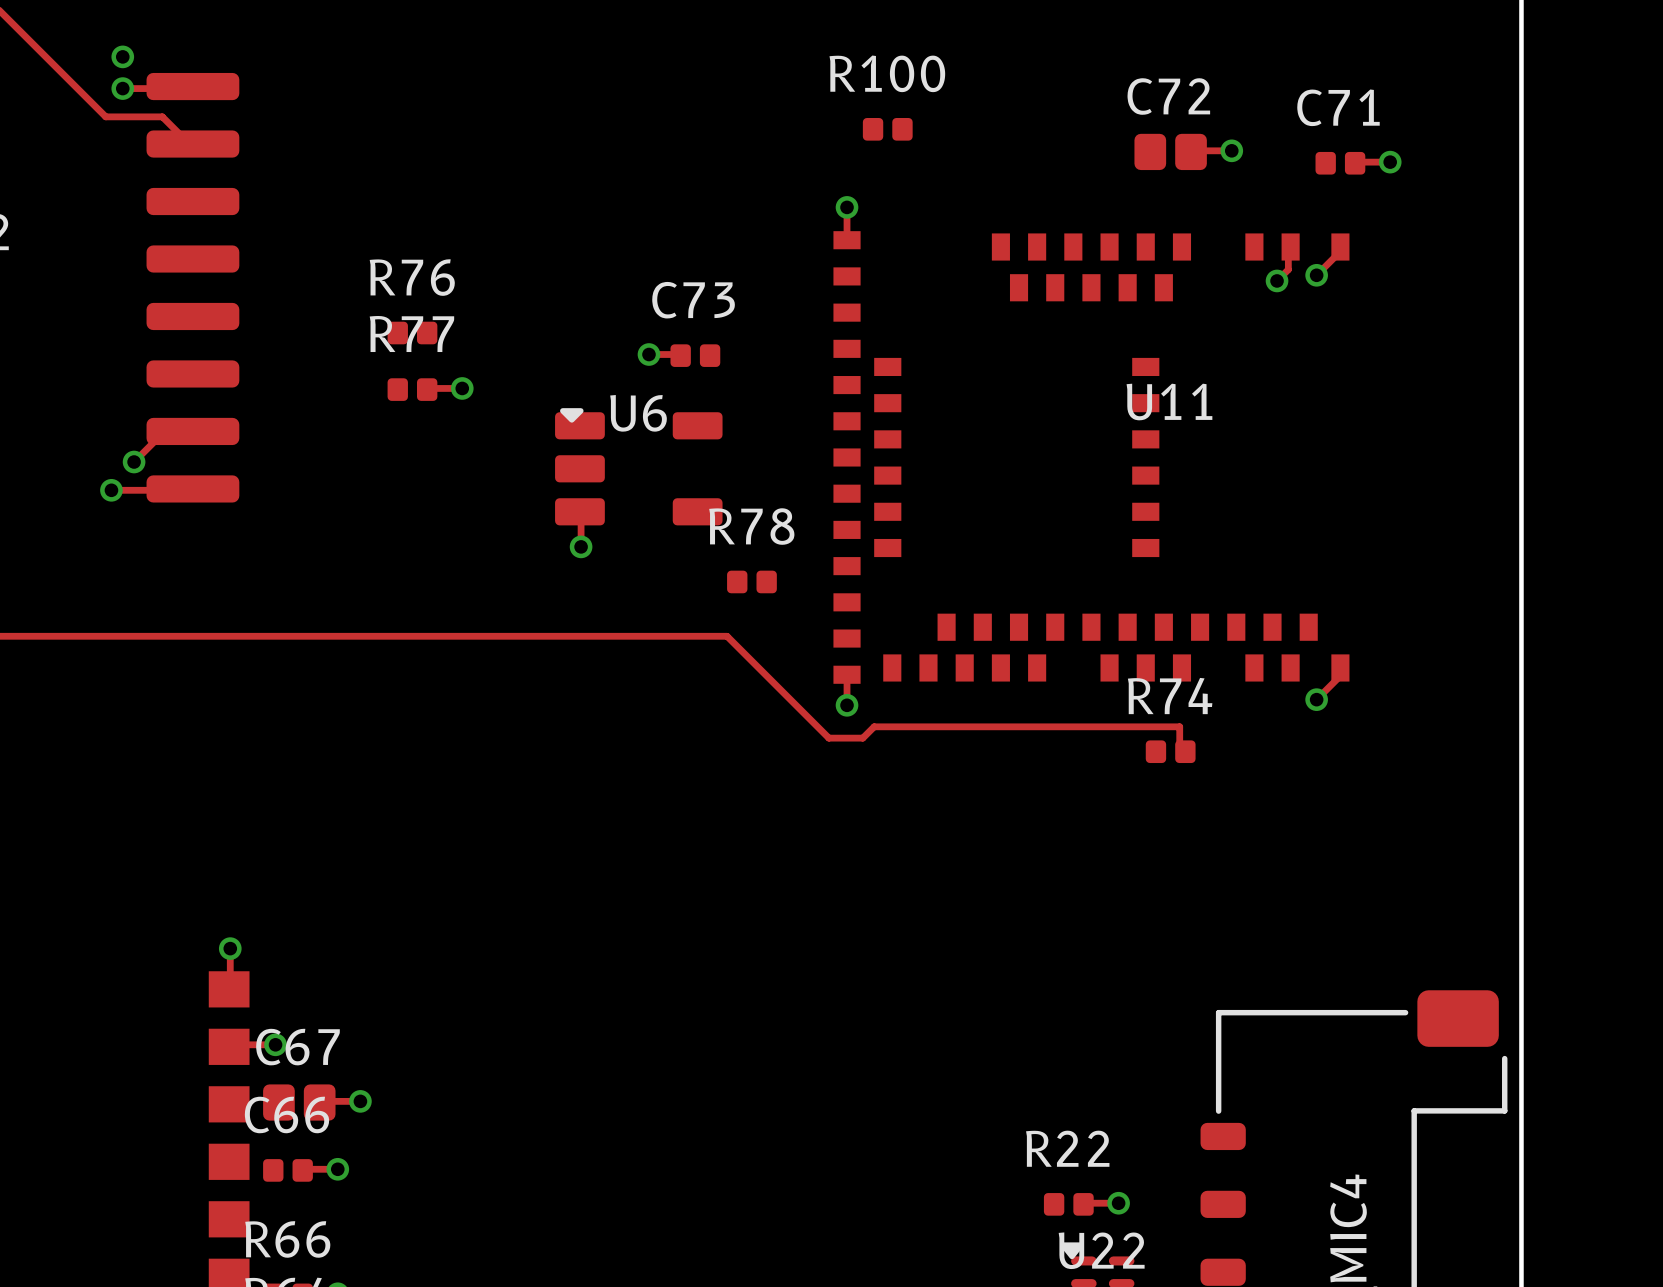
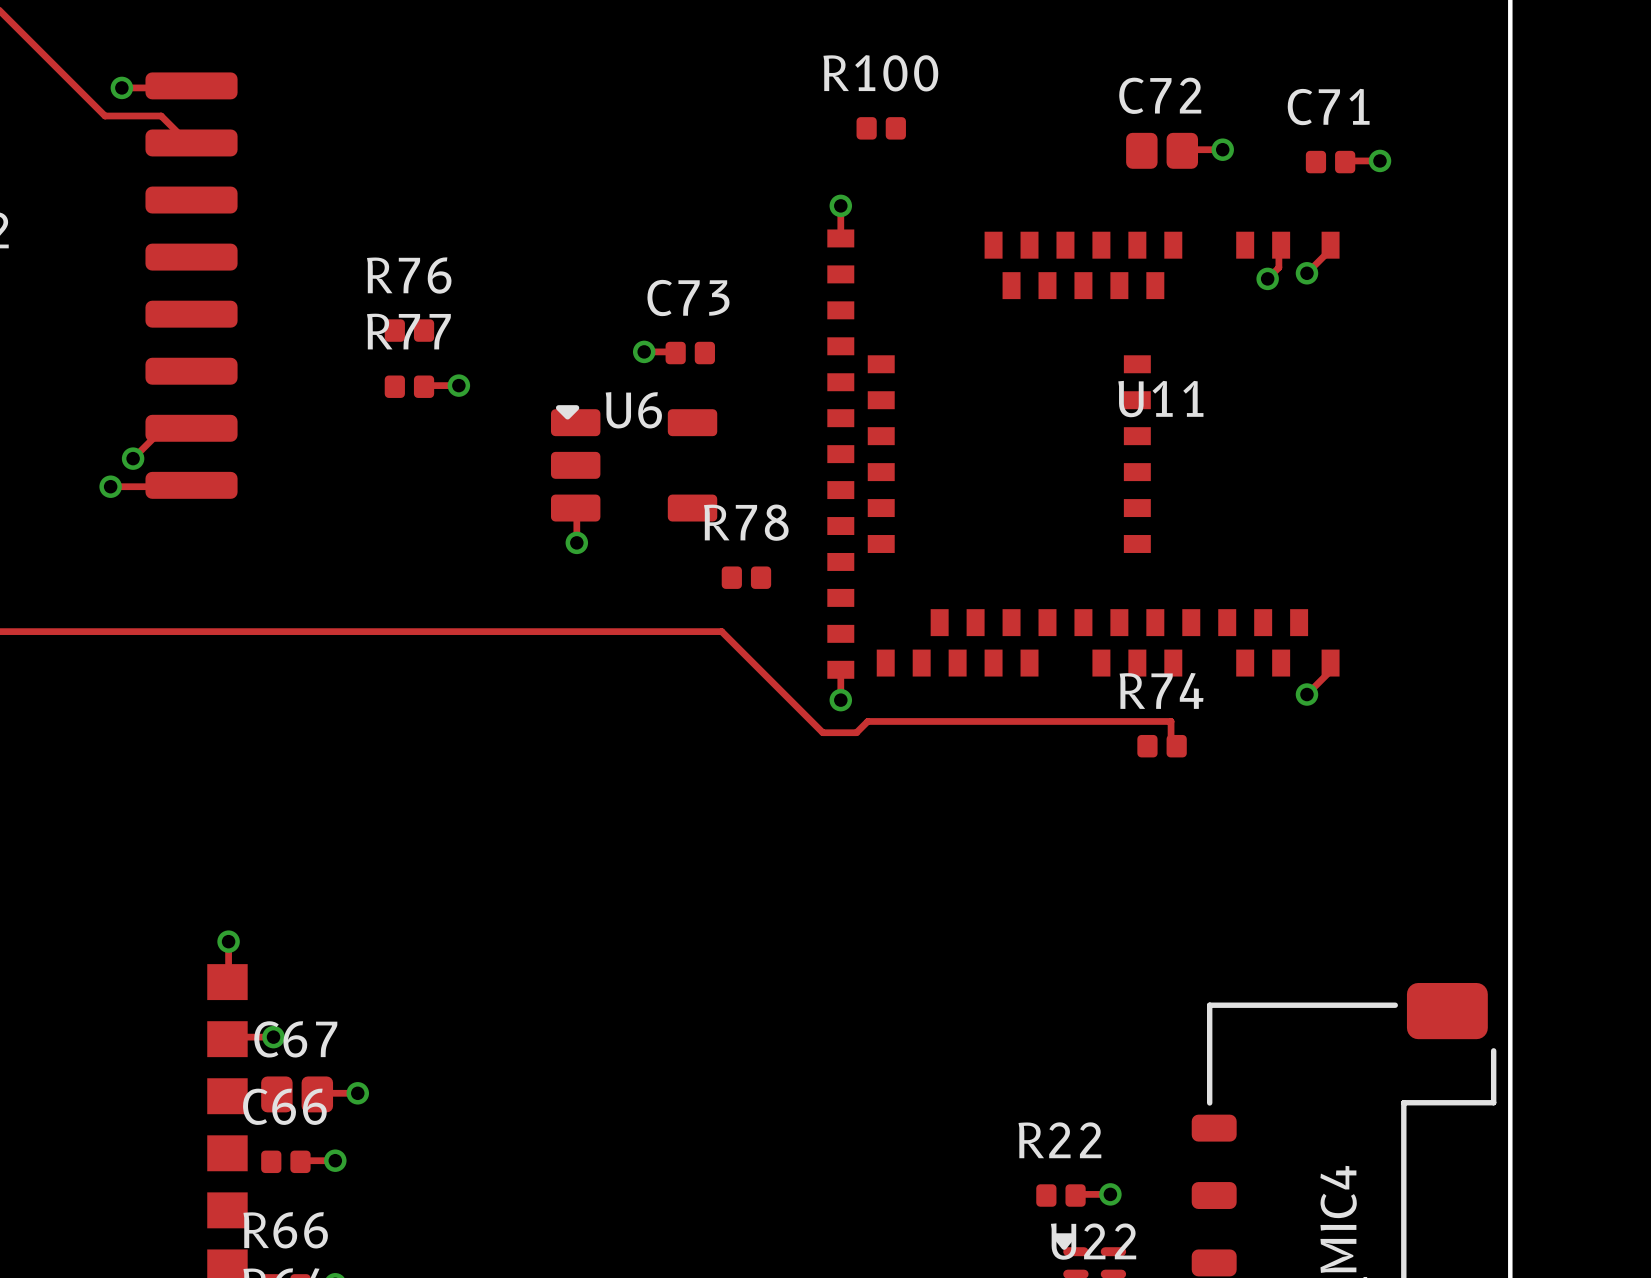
via: (122, 56) -> none

